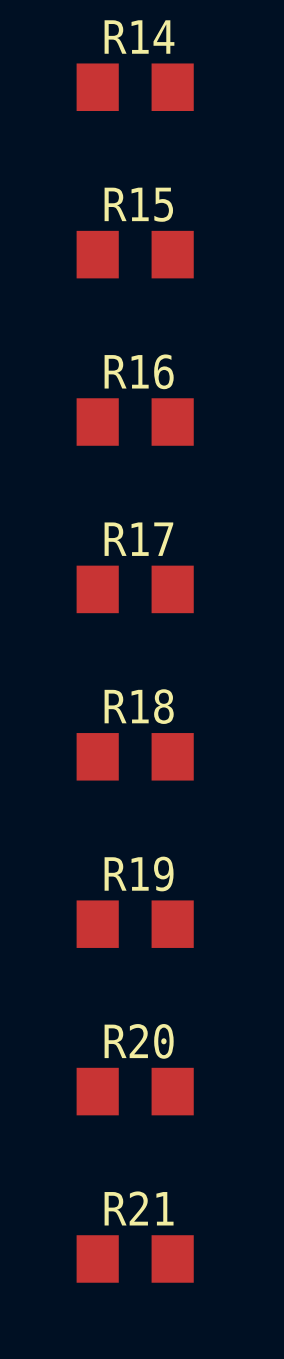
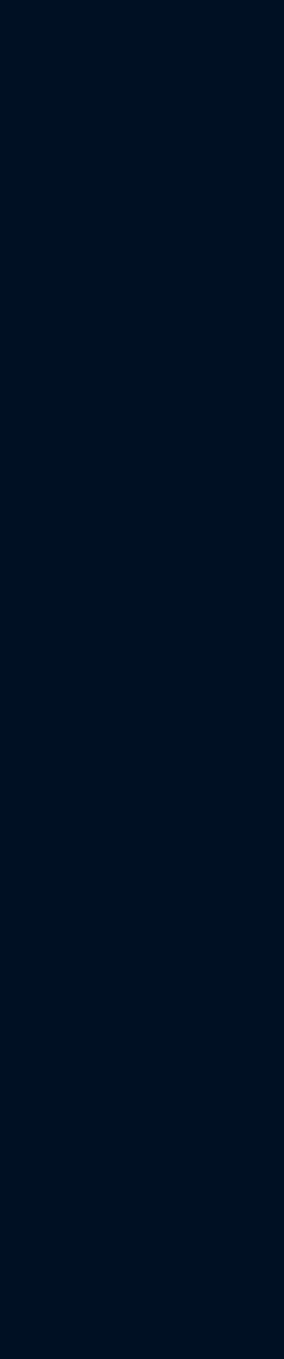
R14: (135, 87) -> none
R15: (135, 254) -> none
R16: (135, 422) -> none
R17: (135, 589) -> none
R18: (135, 756) -> none
R19: (135, 924) -> none
R20: (135, 1091) -> none
R21: (135, 1258) -> none

